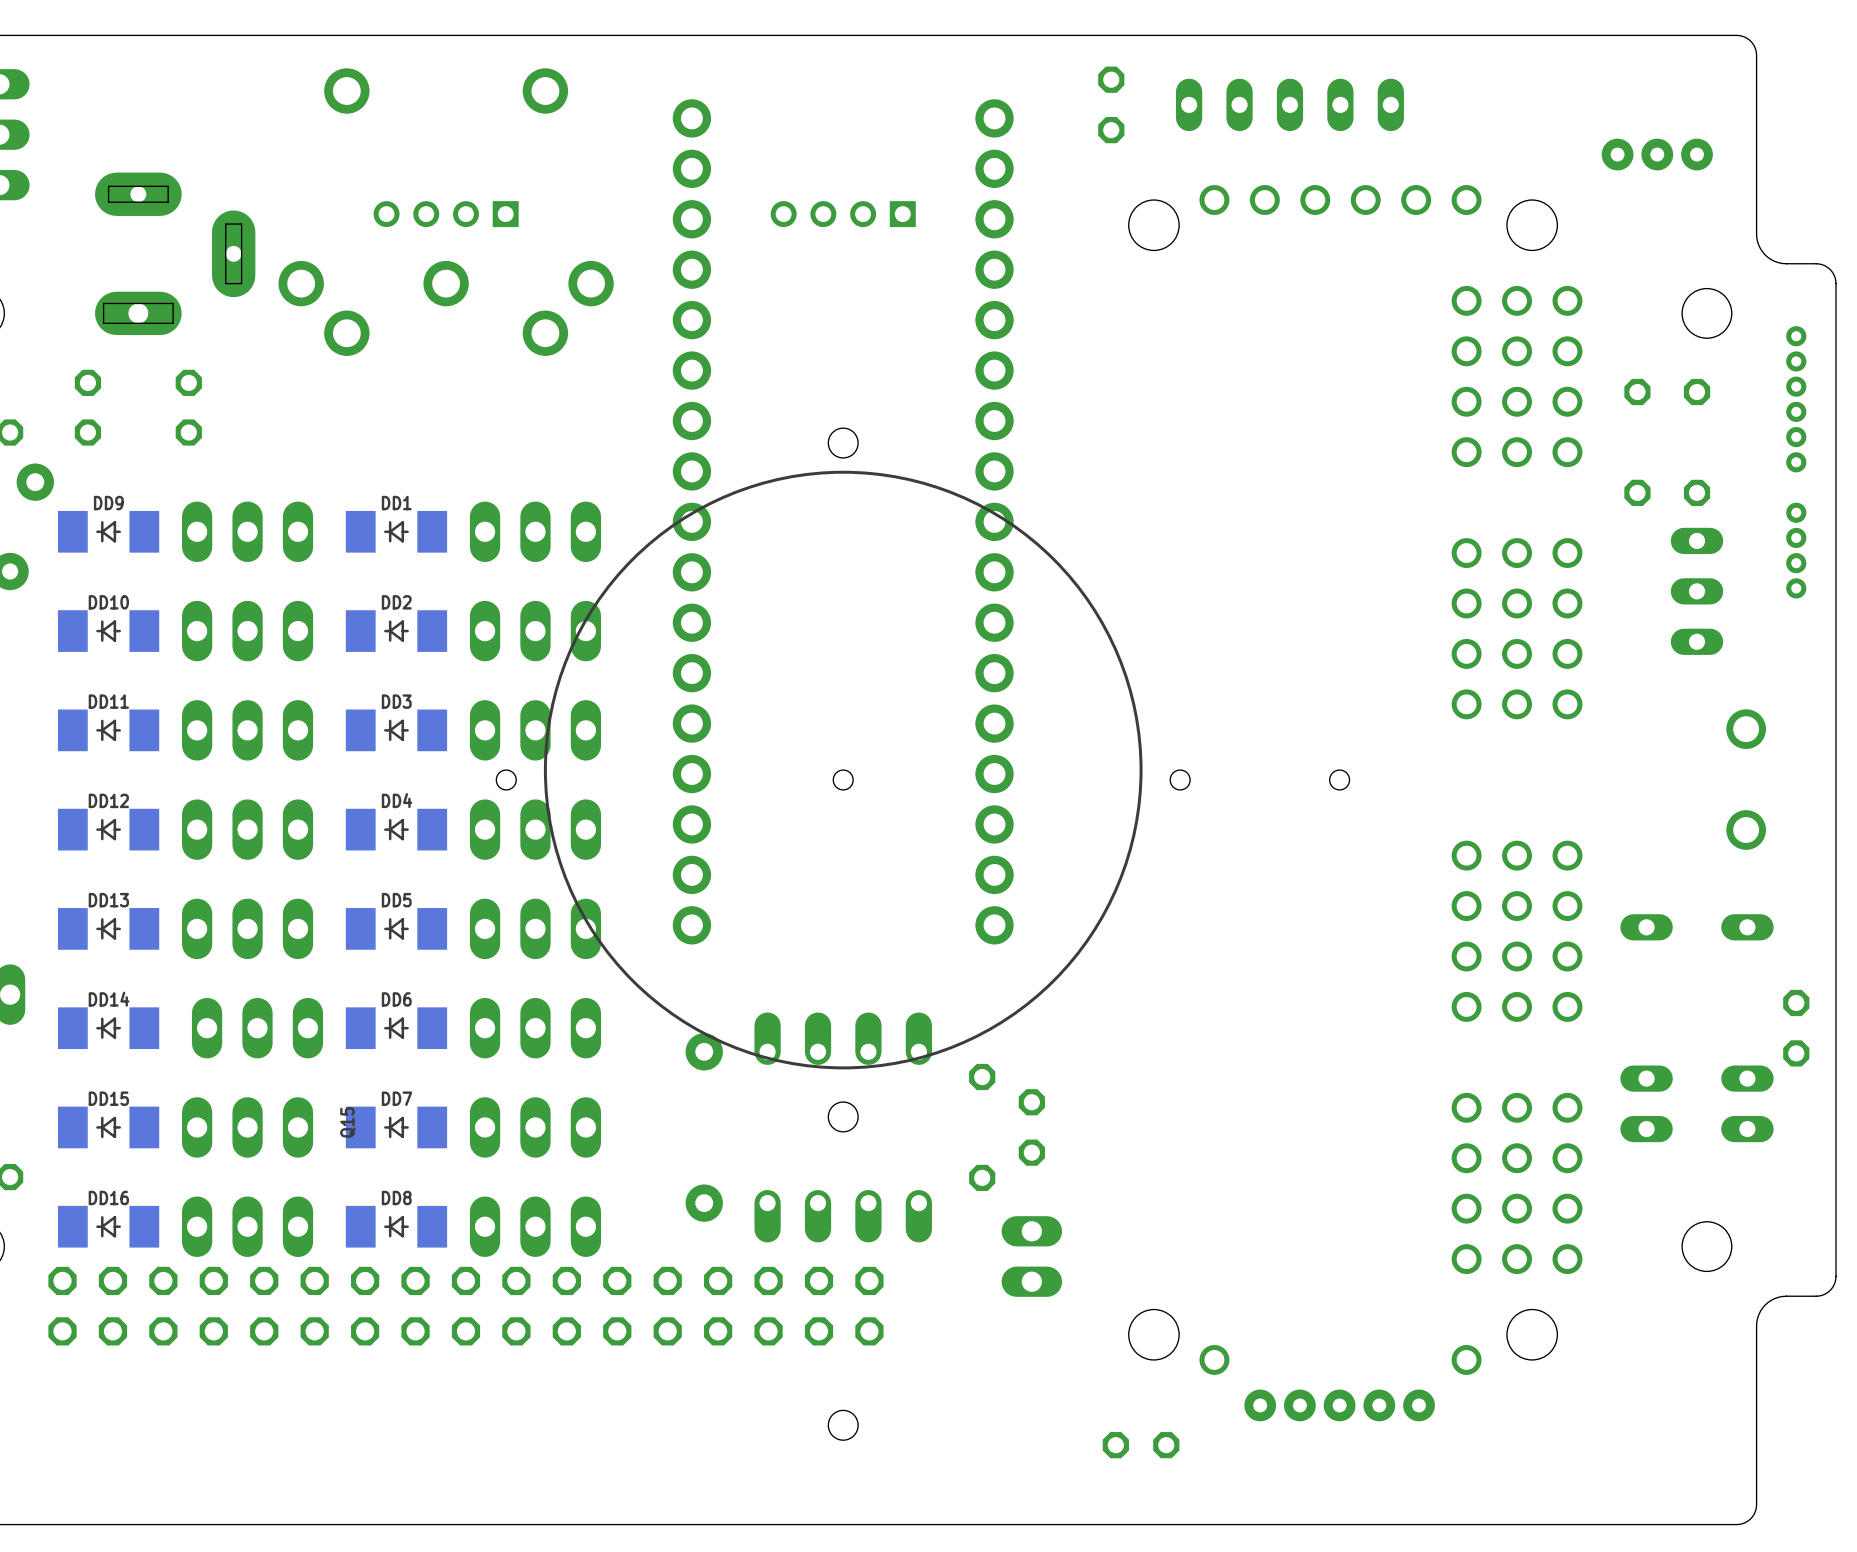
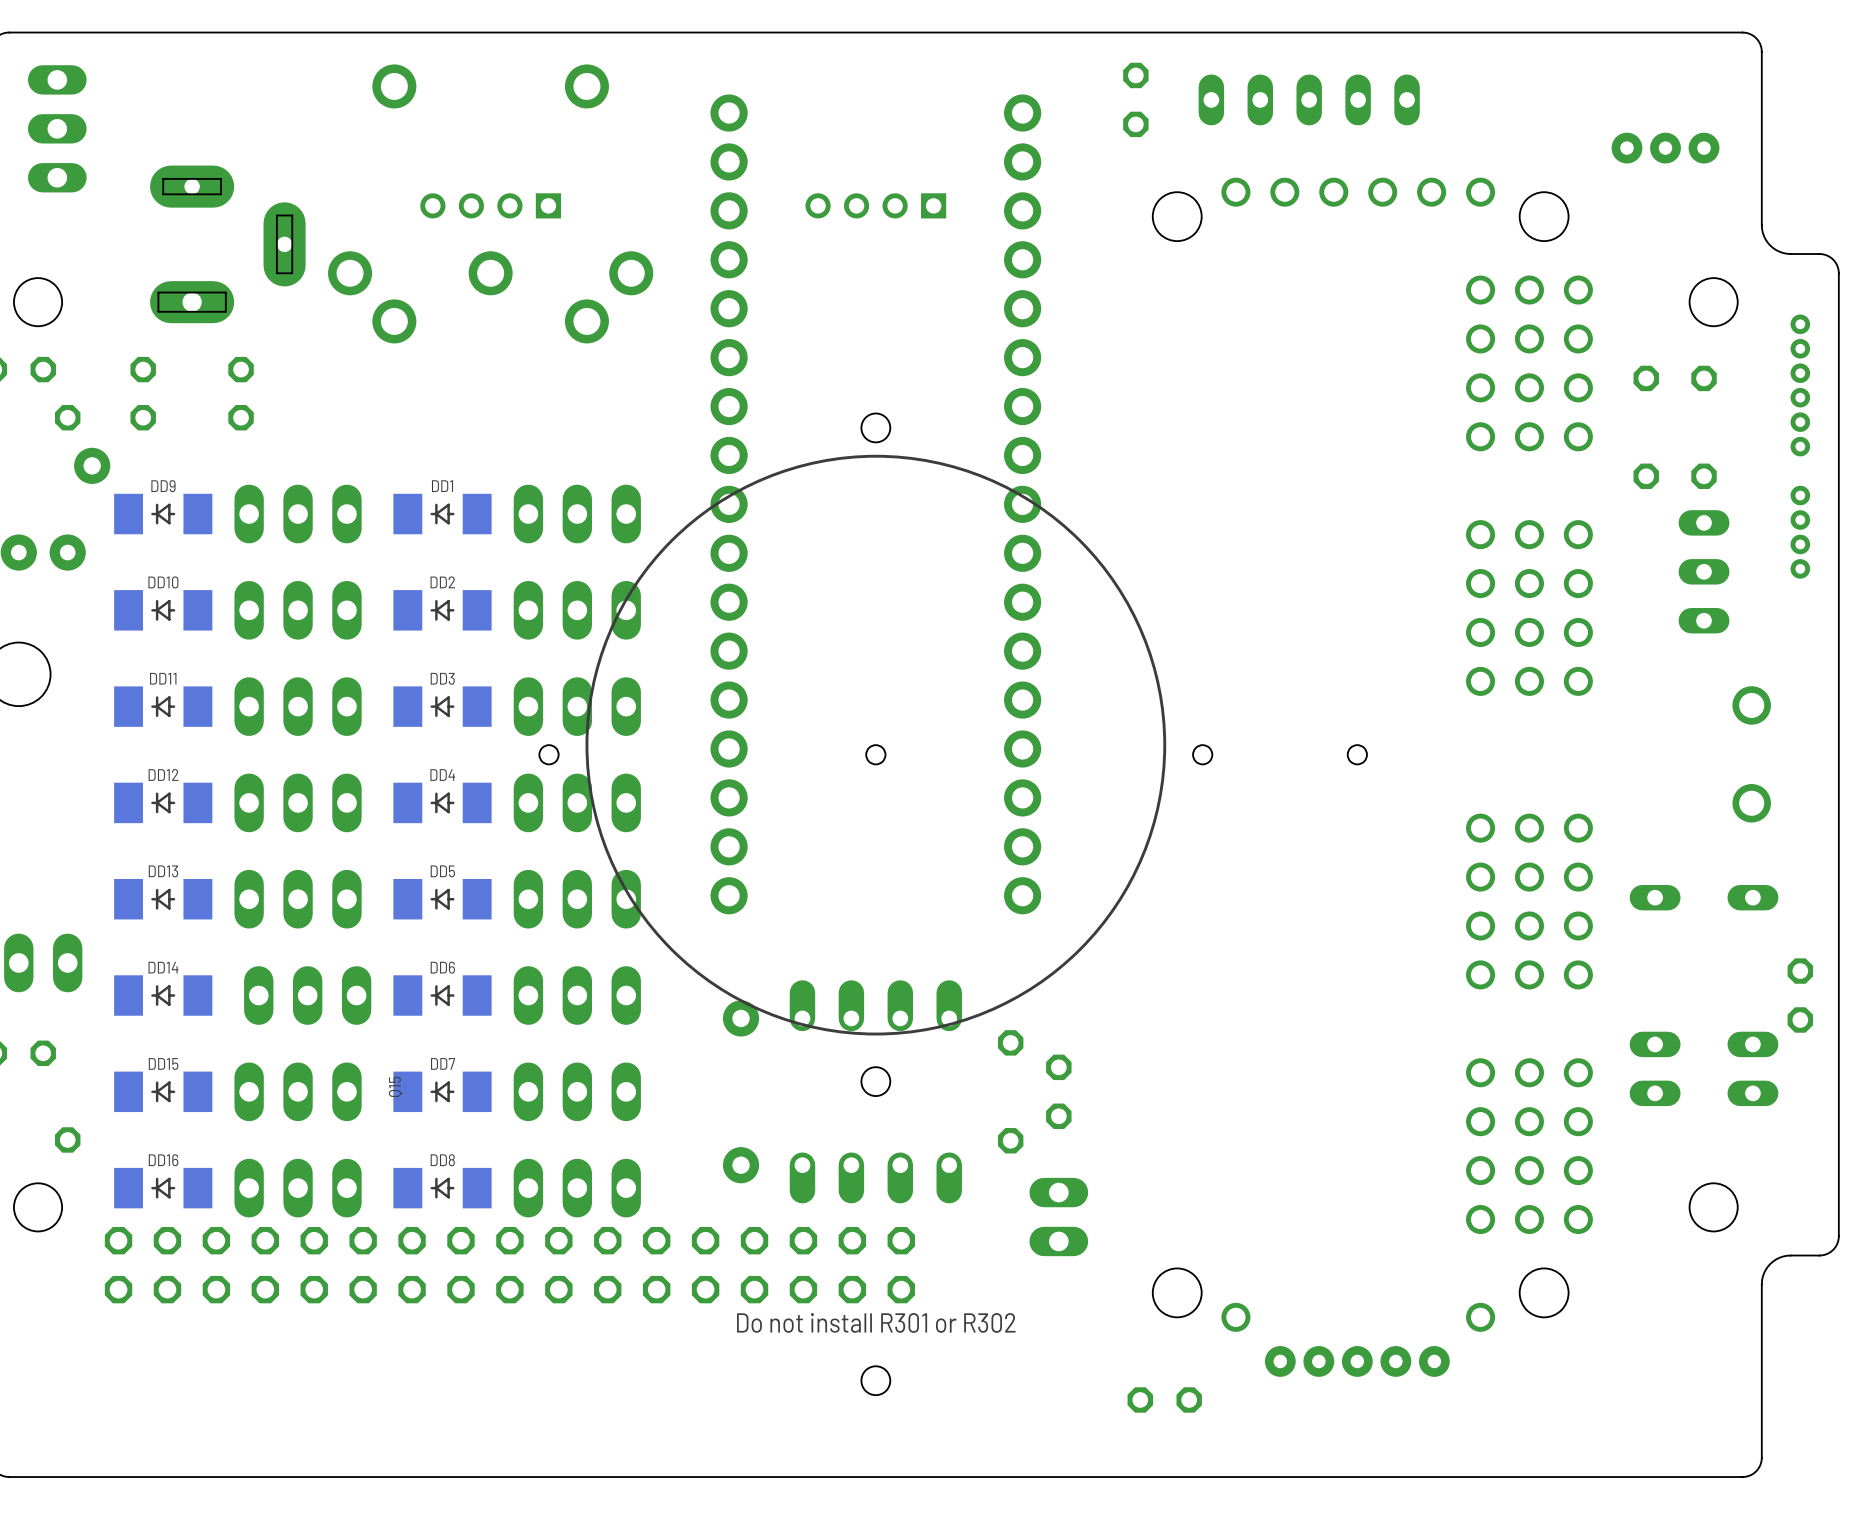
text: none -> Do not install R301 or R302 (876, 1322)

